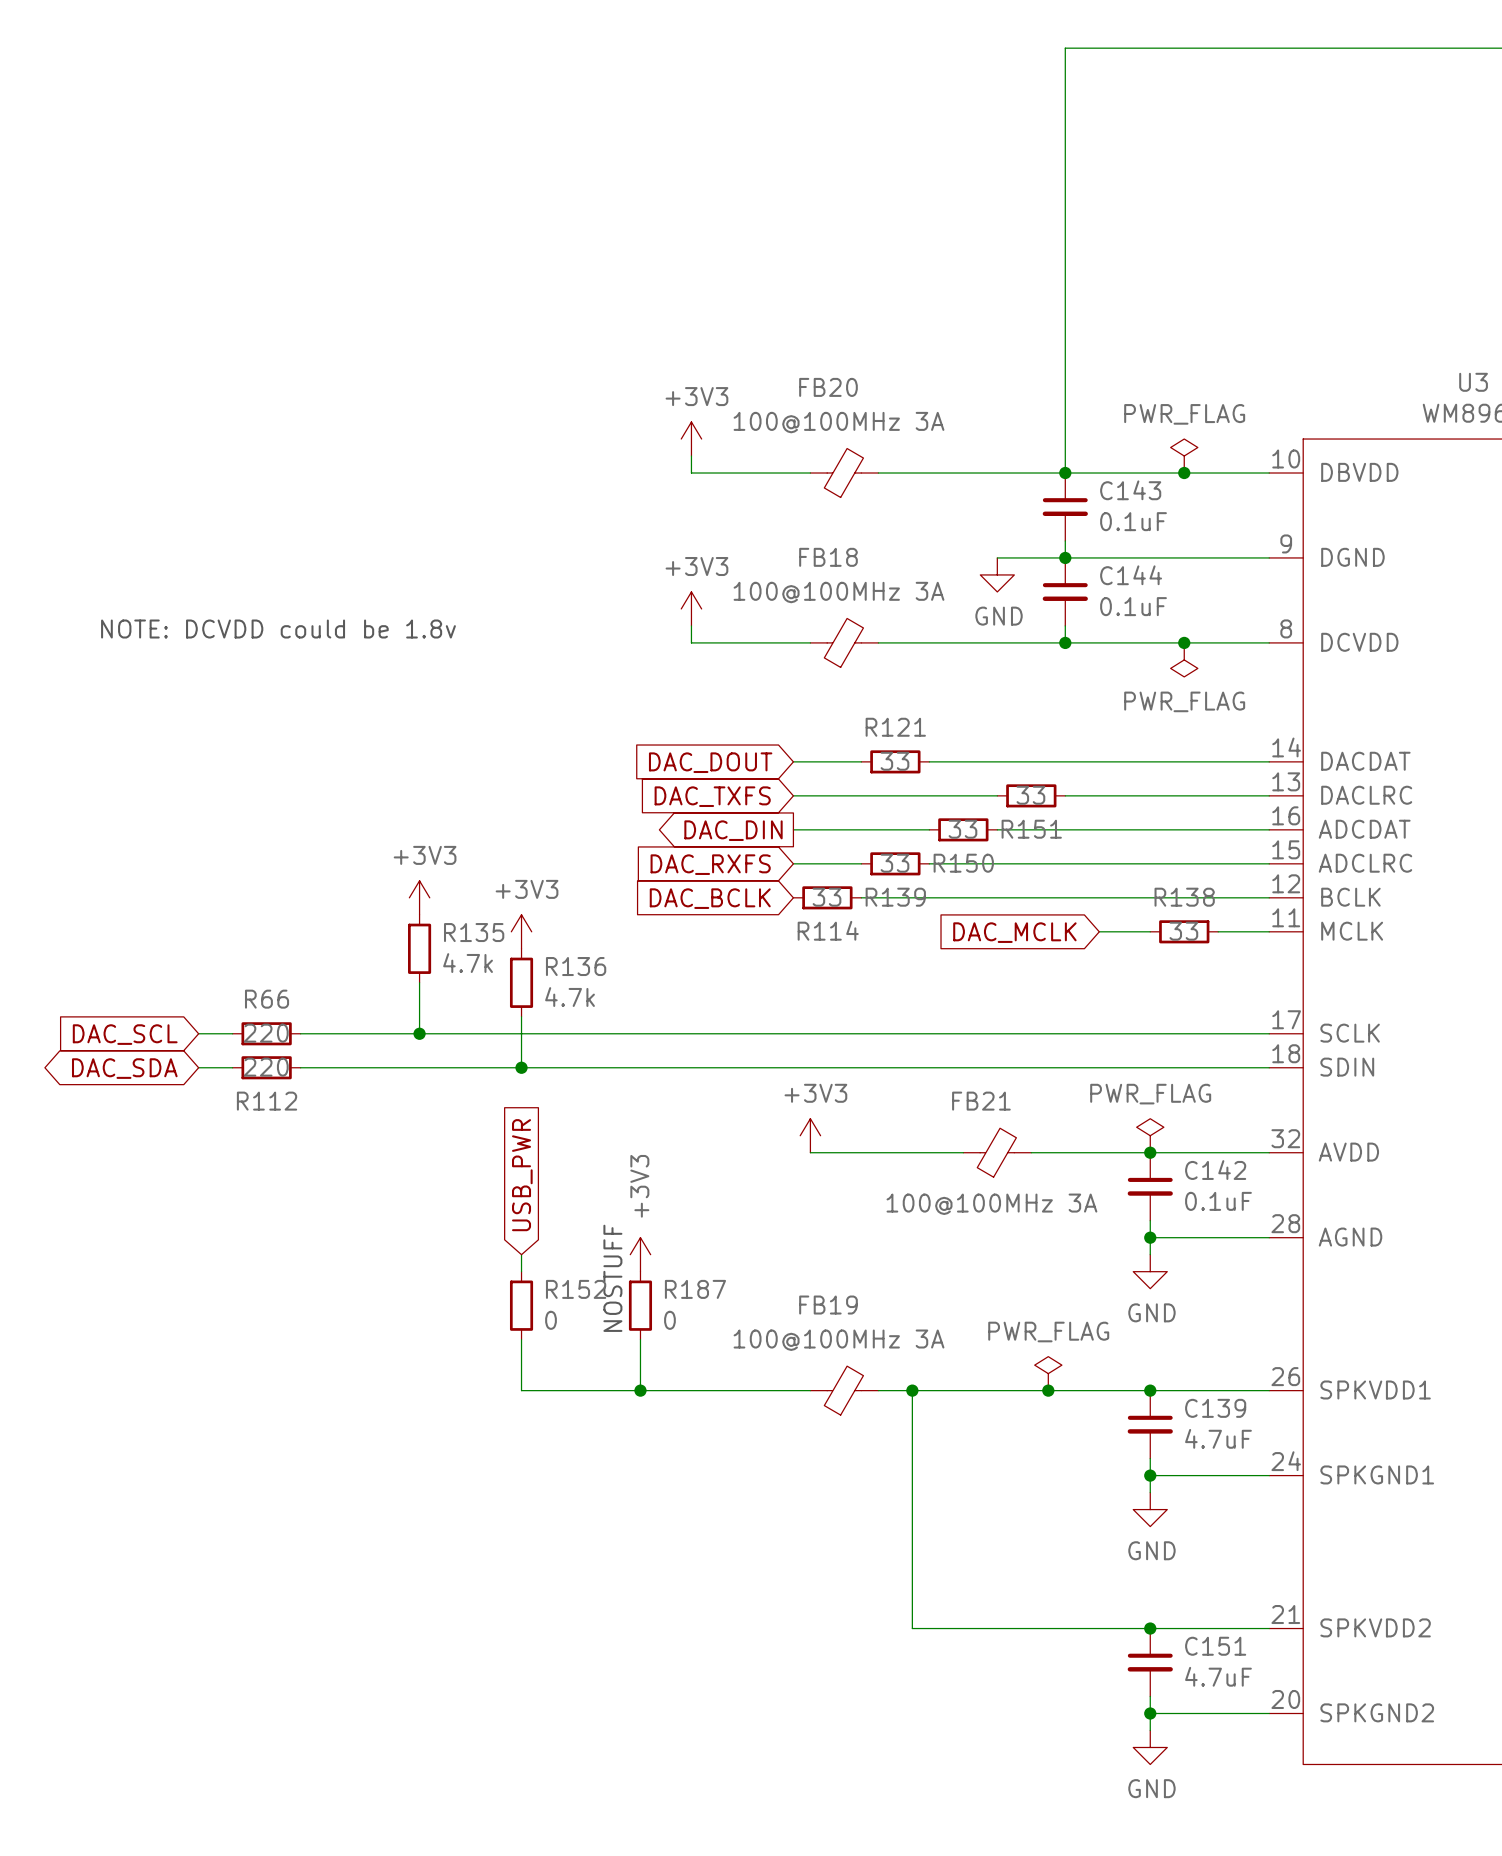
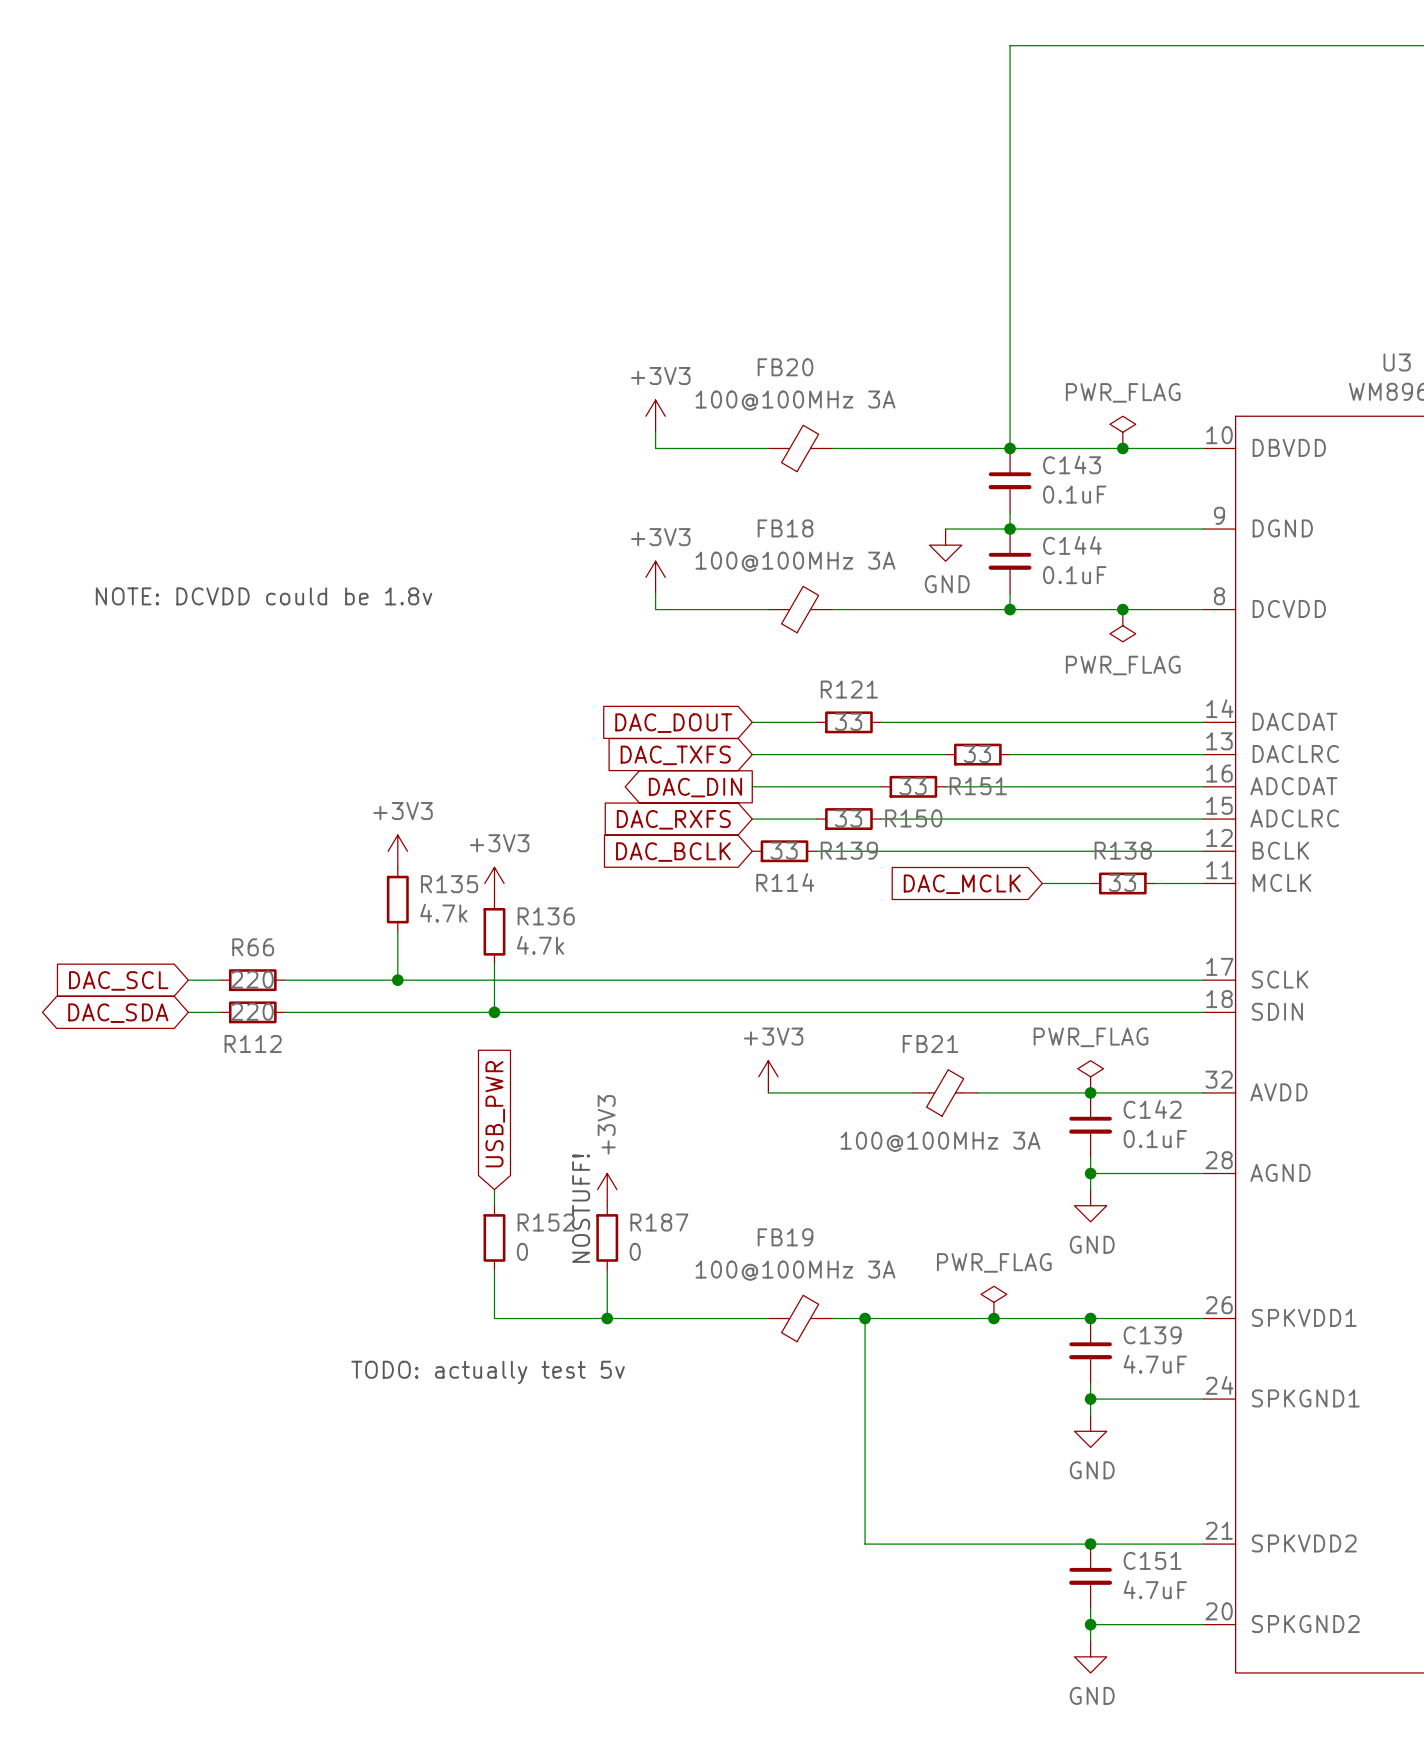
text: NOSTUFF (612, 1278) -> NOSTUFF! (581, 1208)
text: none -> TODO: actually test 5v (488, 1372)

